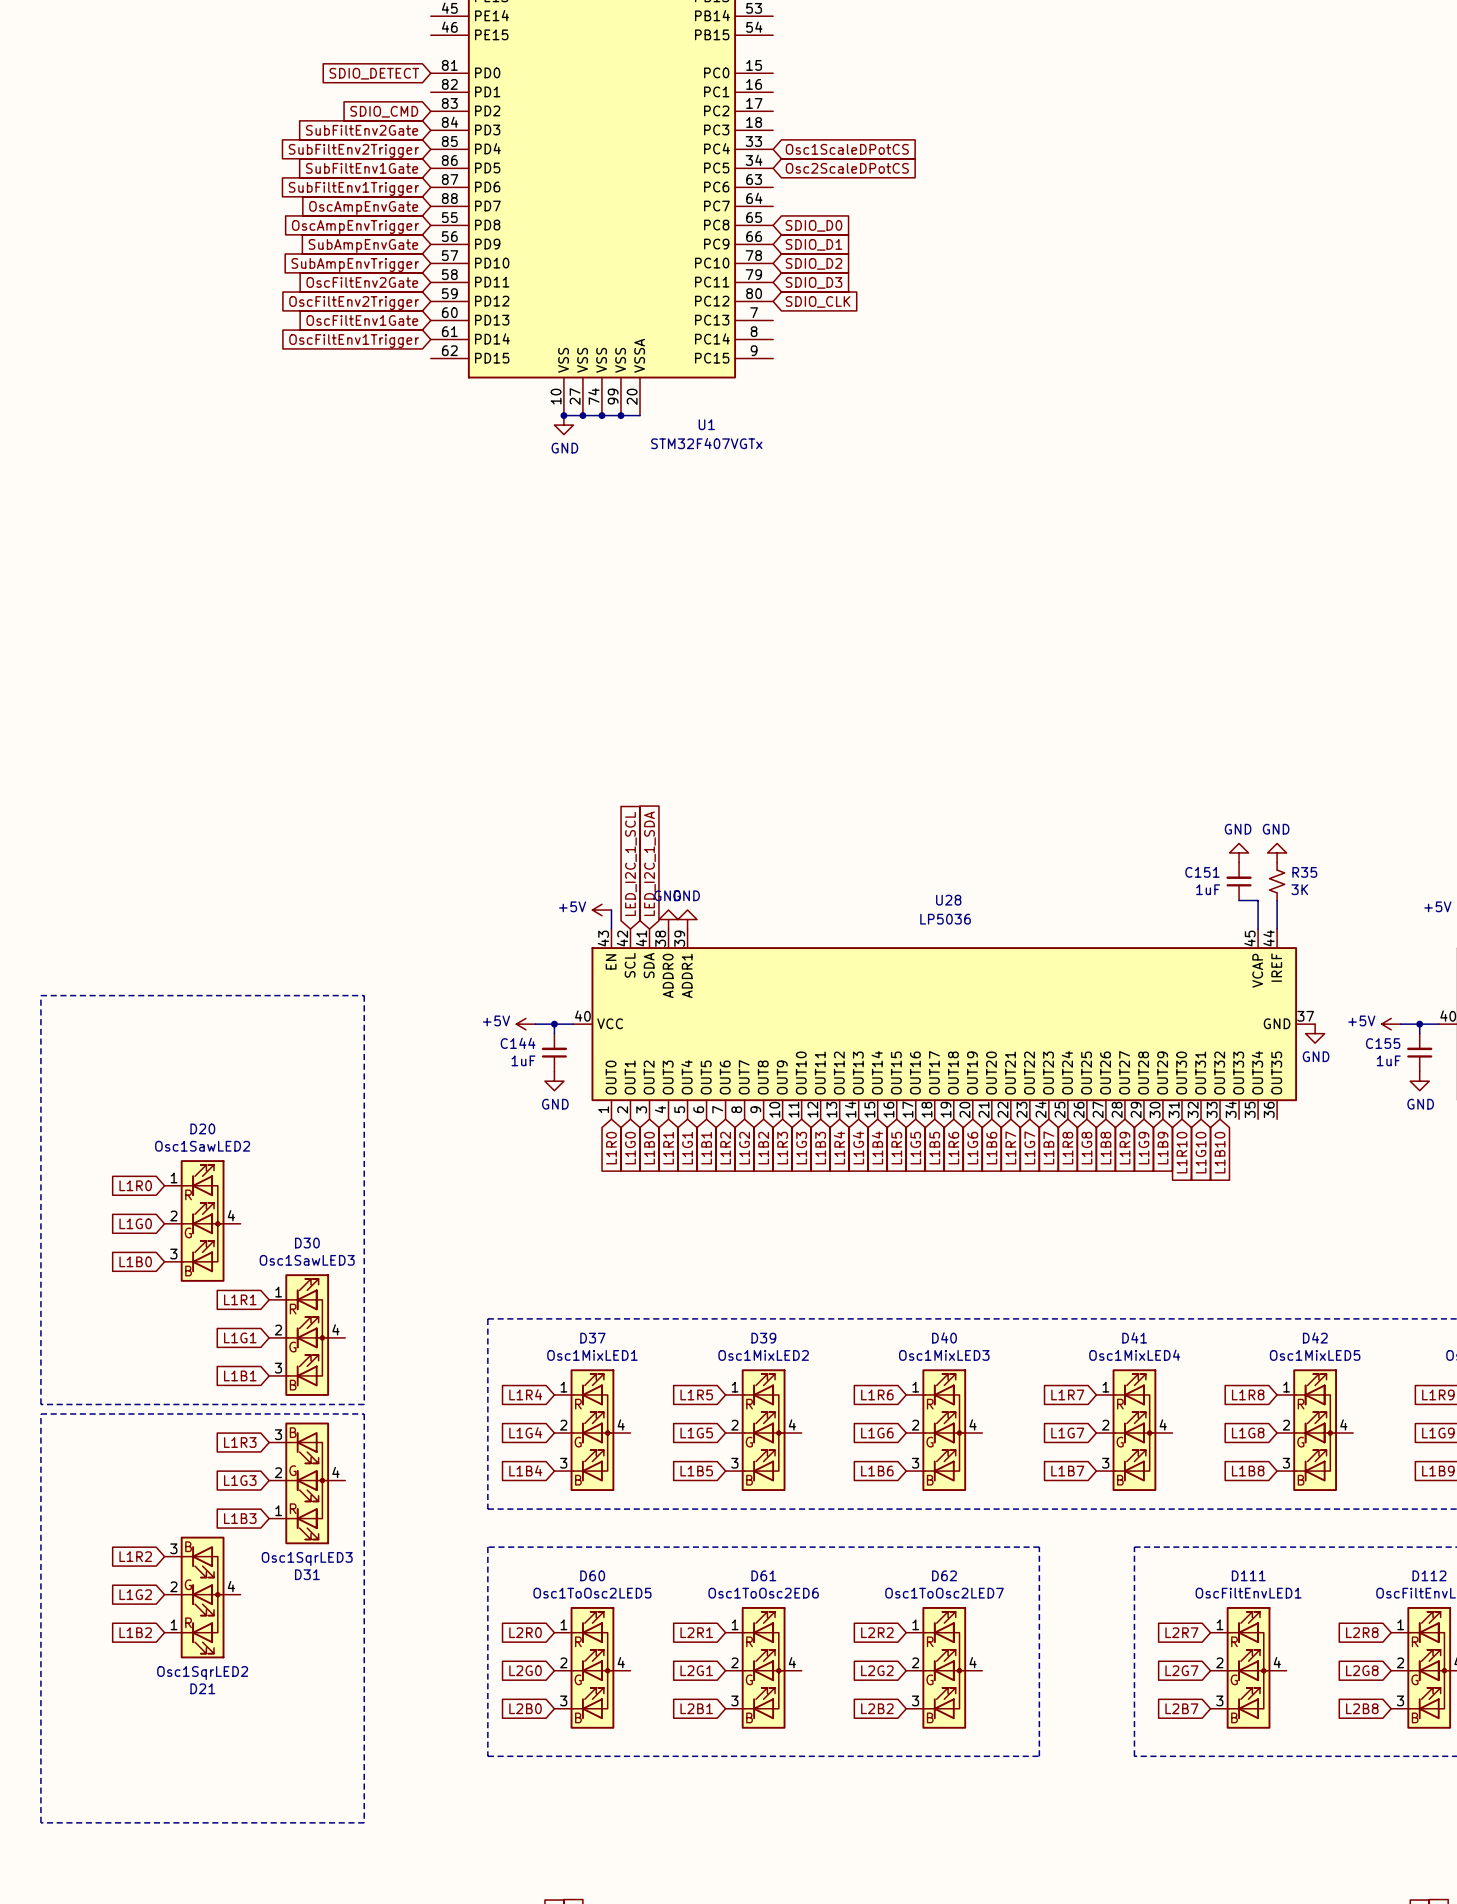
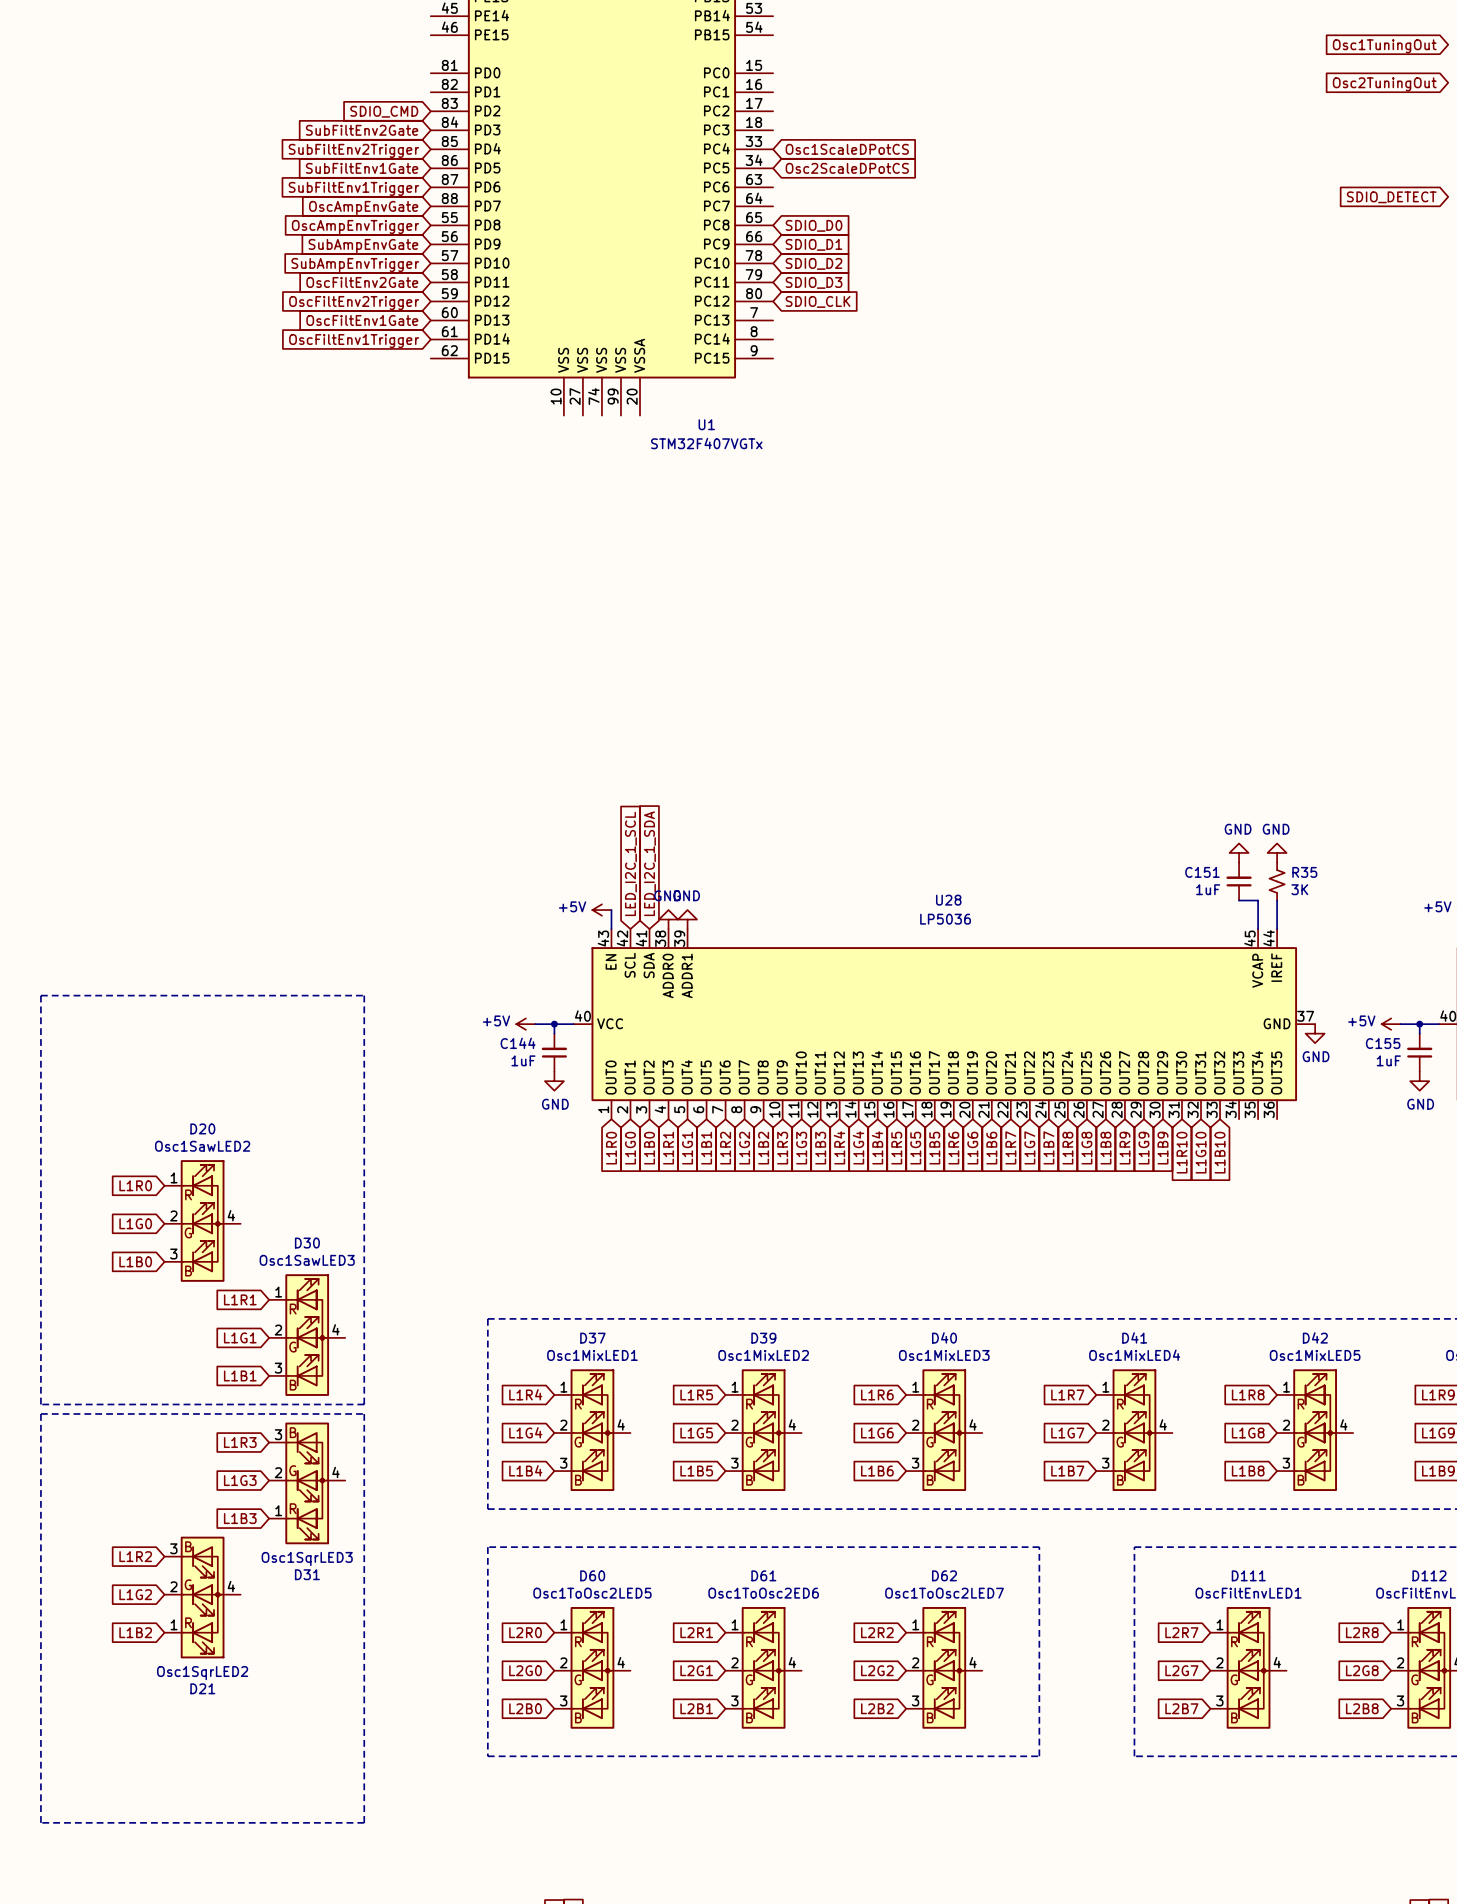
global label: none -> Osc1TuningOut (1384, 46)
global label: SDIO_DETECT (374, 73) -> none
global label: none -> Osc2TuningOut (1384, 84)
global label: none -> SDIO_DETECT (1391, 197)
wire: (563, 415) (640, 415) -> none
junction: (563, 415) -> none
junction: (582, 415) -> none
junction: (601, 415) -> none
junction: (620, 415) -> none
power symbol: GND (563, 425) -> none

